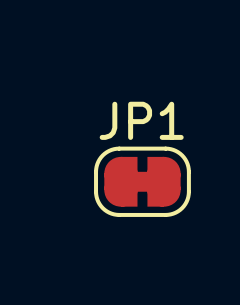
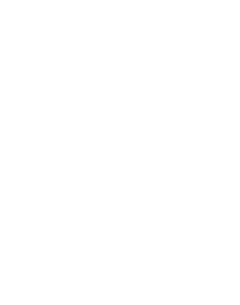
JP1: (142, 181) -> none

